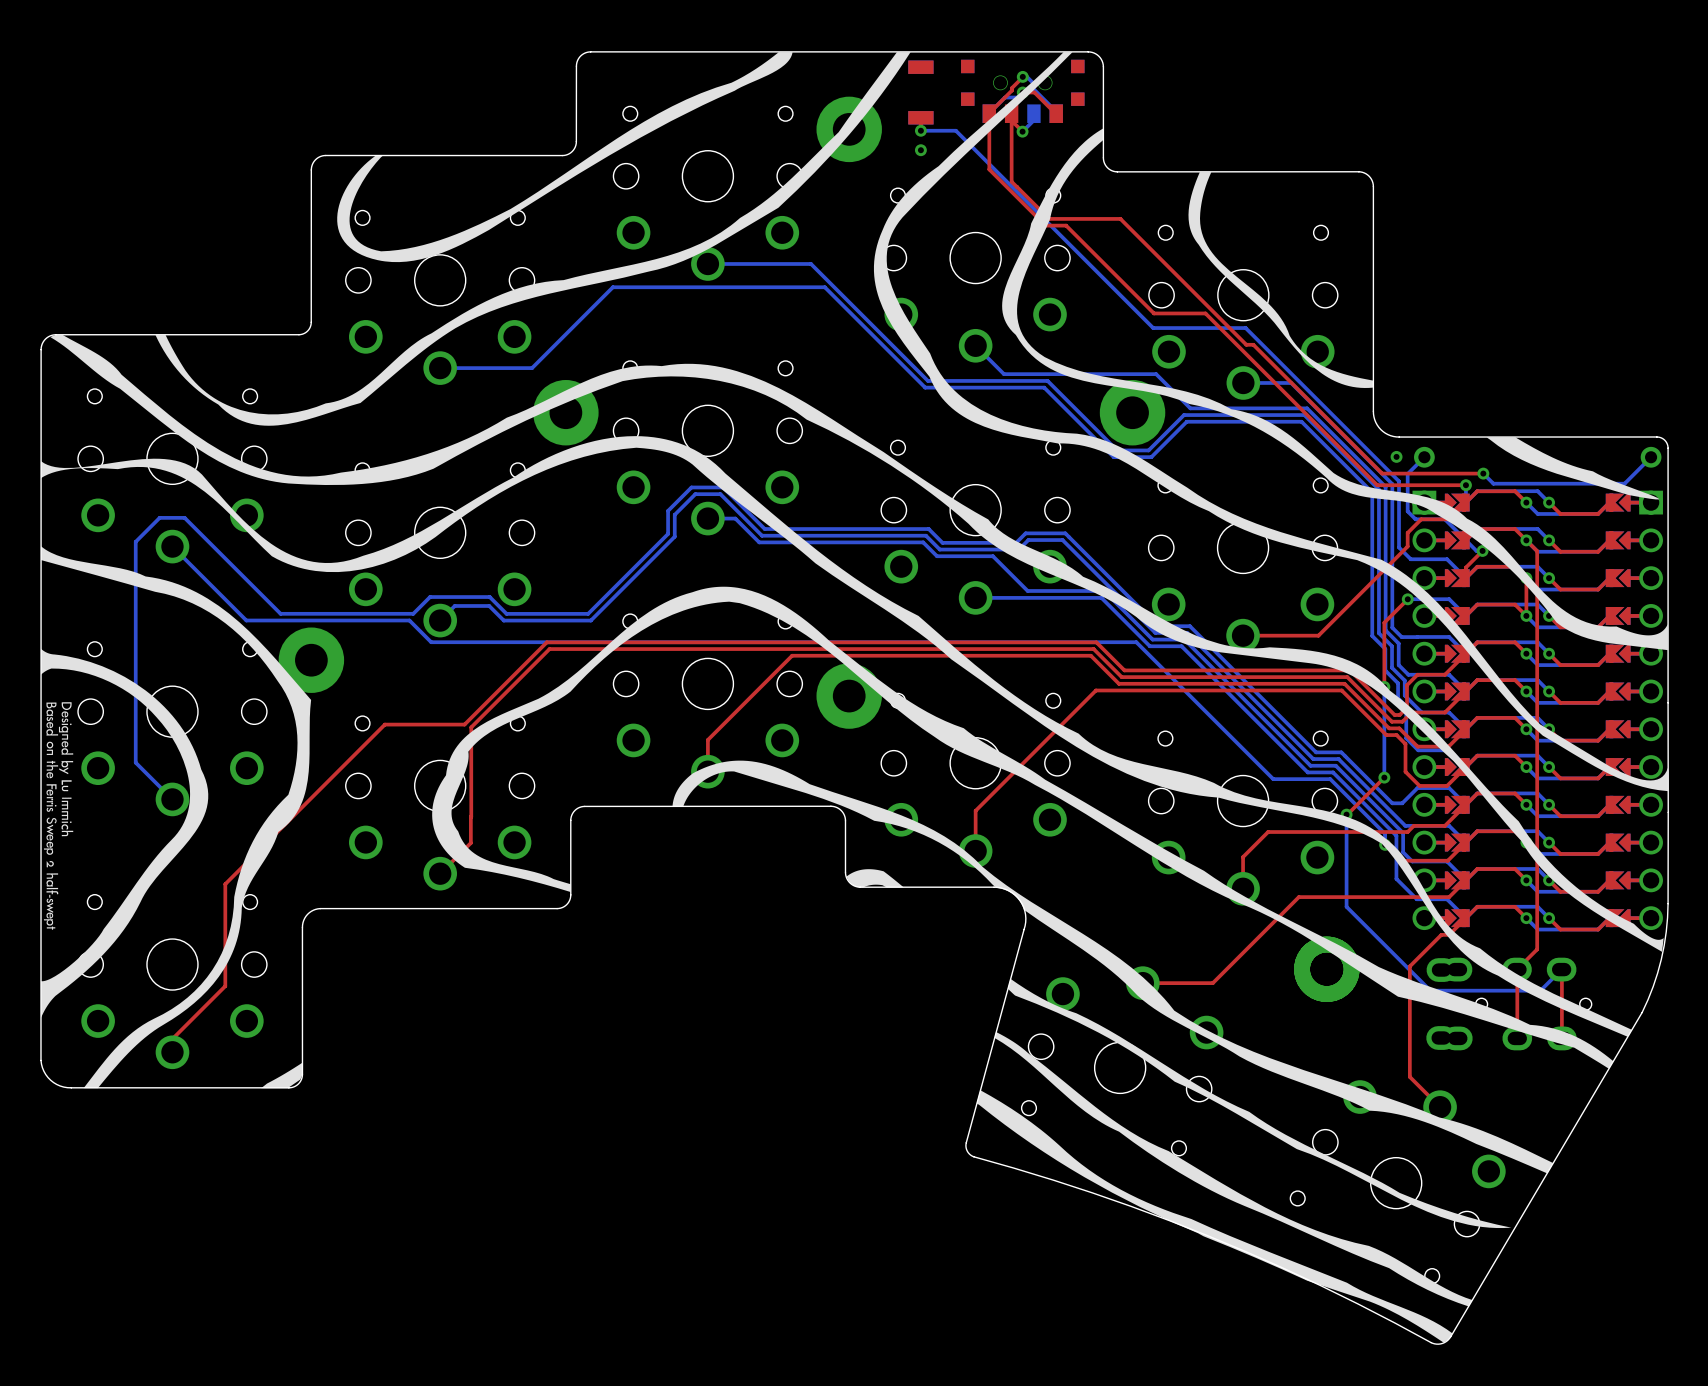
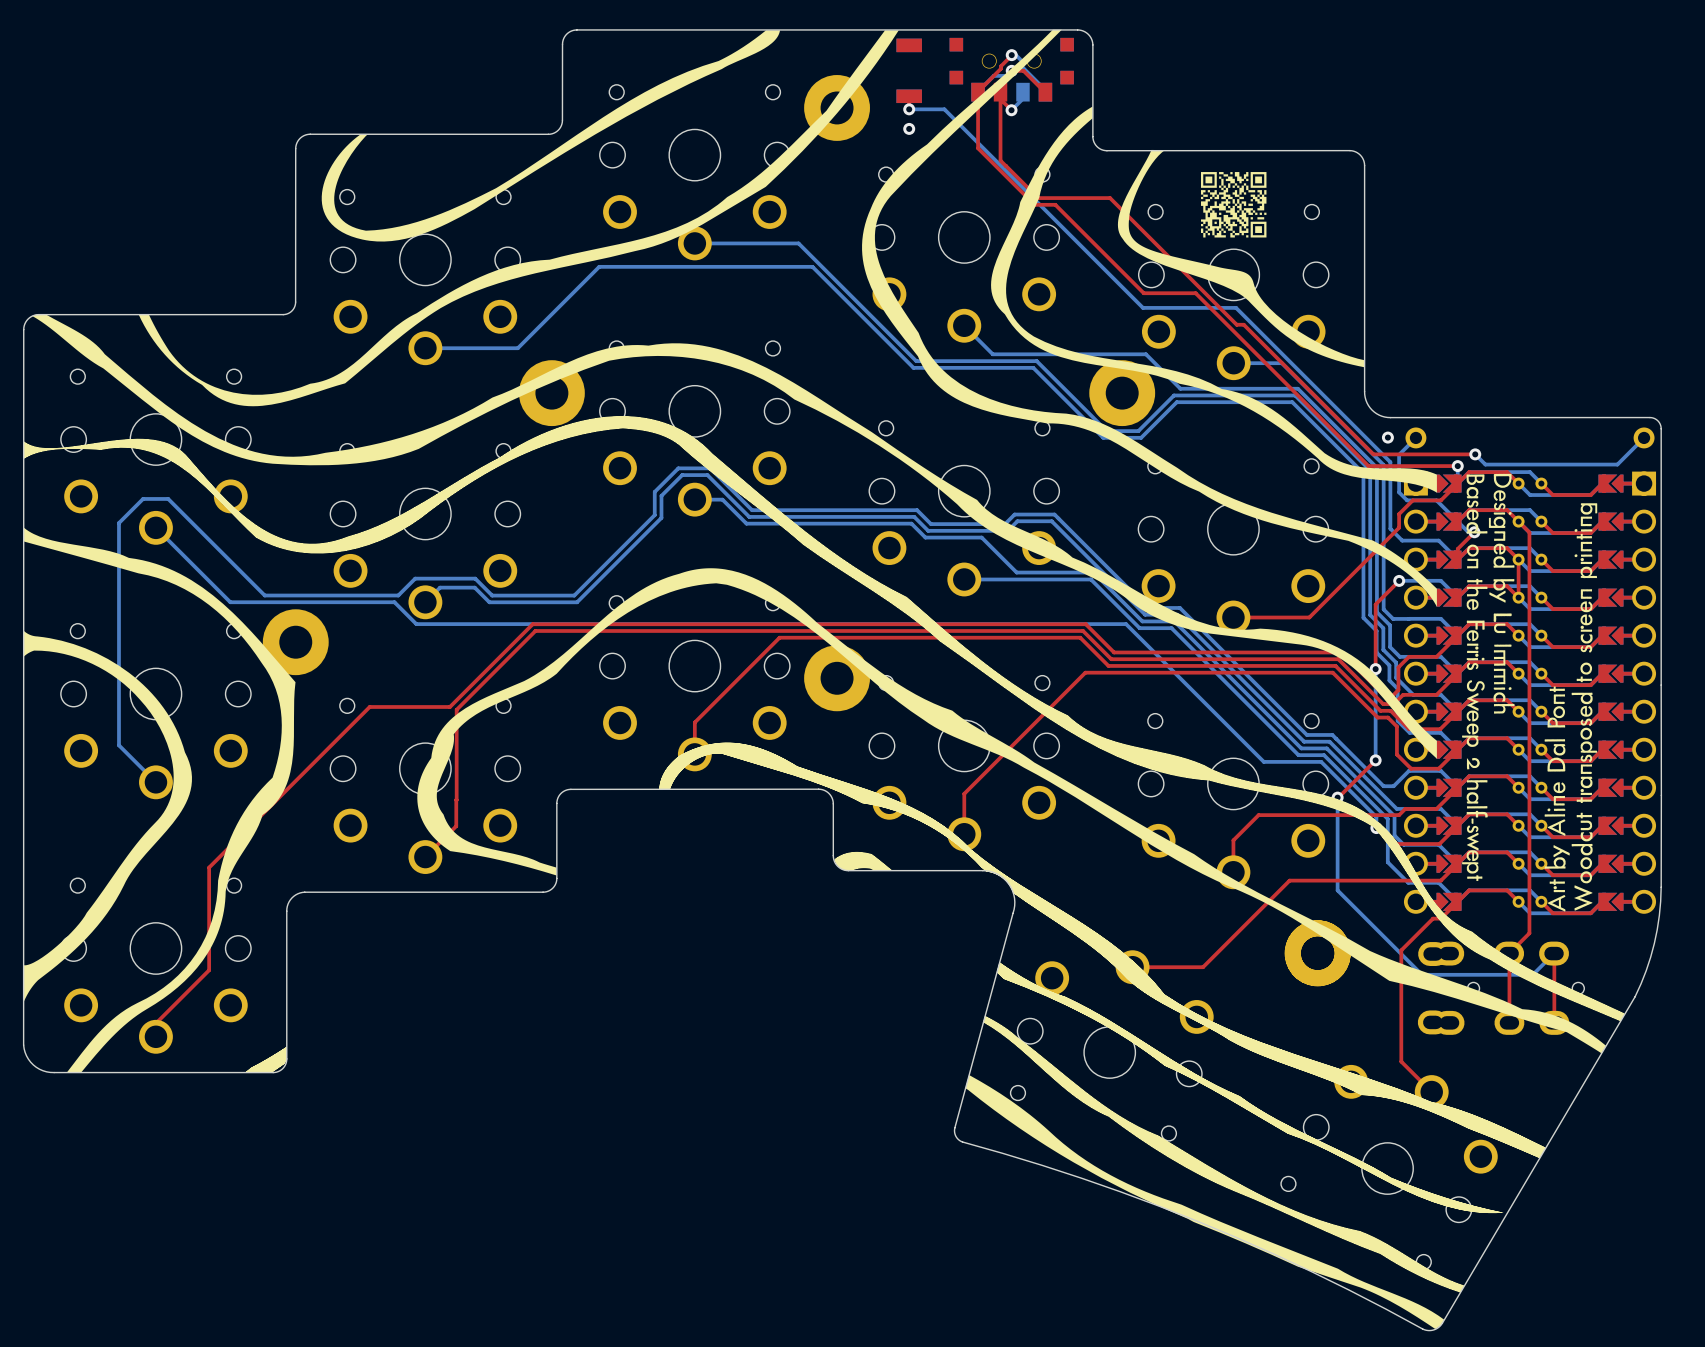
drawing: none -> [23, 29, 1625, 1292]
drawing: [41, 52, 1668, 1229] -> none
drawing: [261, 1062, 303, 1089] -> none
drawing: none -> [245, 1046, 287, 1073]

